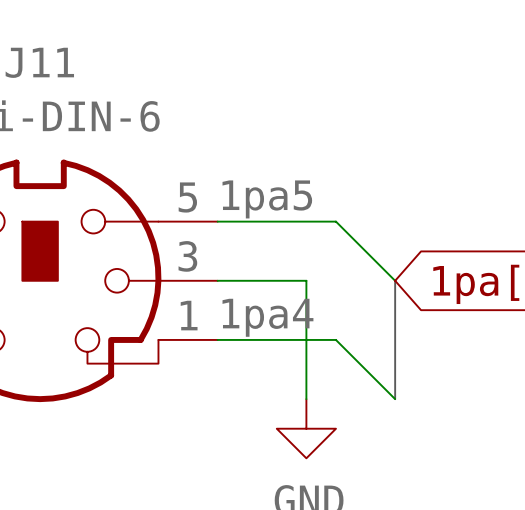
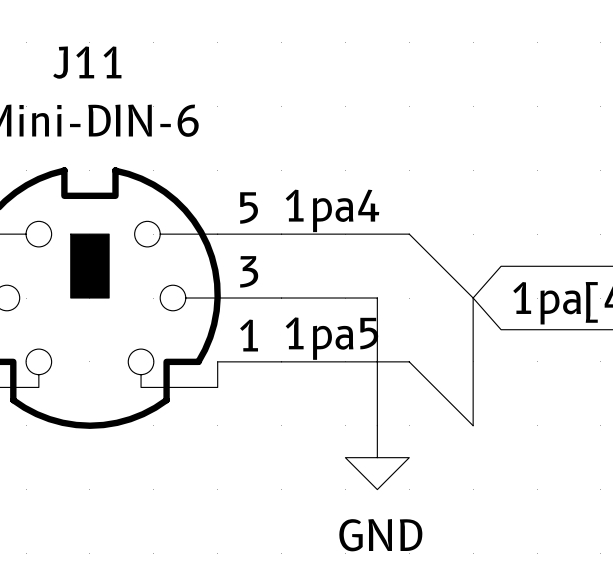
label: 1pa5 (267, 199) -> 1pa4 (332, 210)
label: 1pa4 (267, 317) -> 1pa5 (331, 338)

